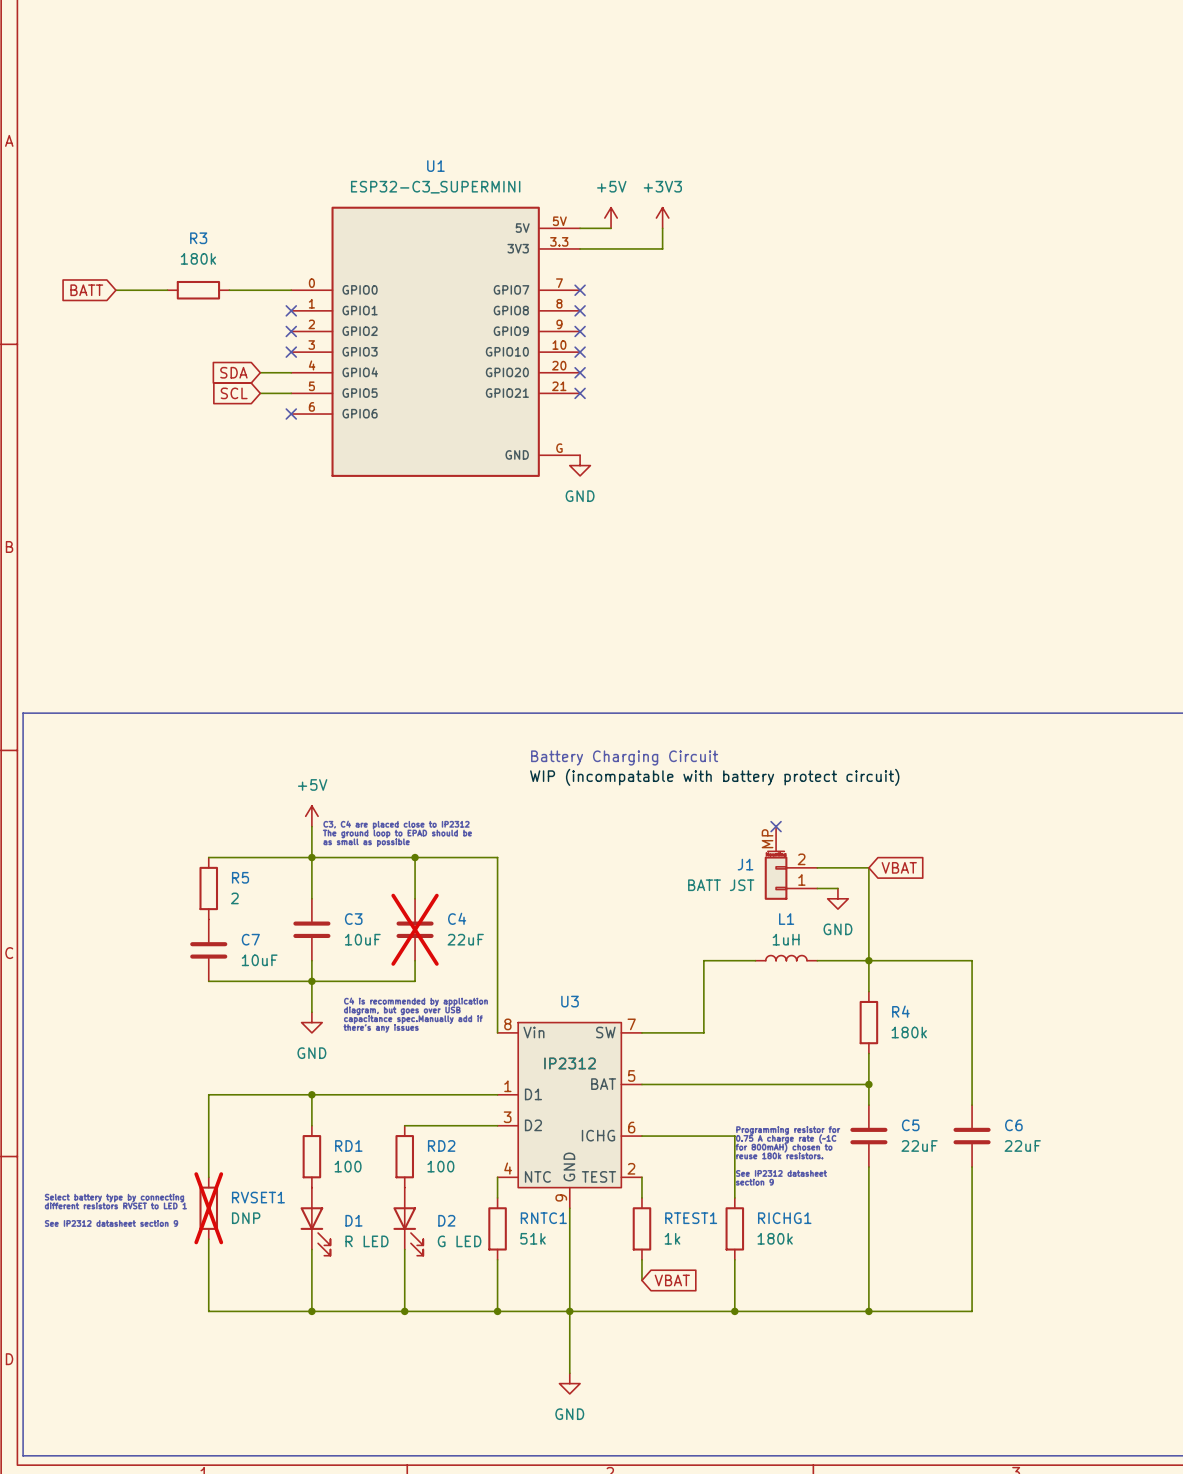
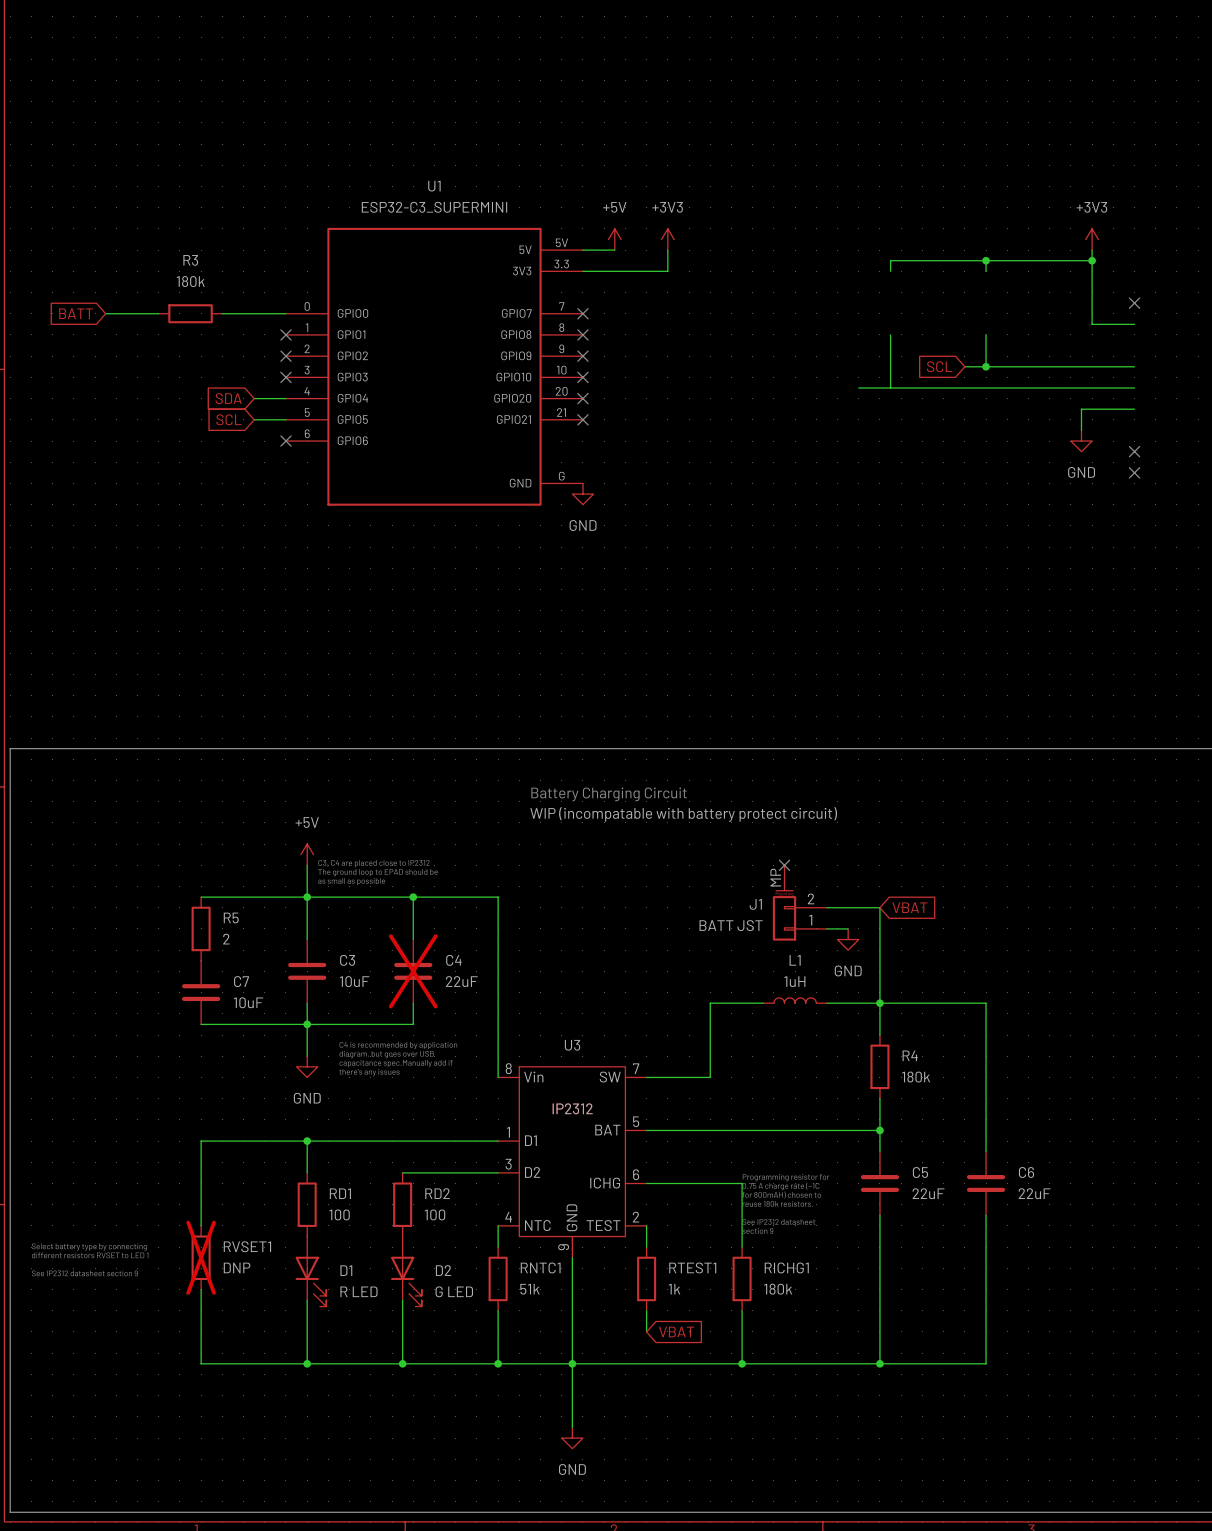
power symbol: none -> +3V3 (1092, 239)
wire: none -> (1092, 250) (1092, 324) (1134, 324)
wire: none -> (986, 260) (986, 271)
junction: none -> (986, 260)
wire: none -> (1092, 260) (890, 260) (890, 271)
junction: none -> (1092, 260)
no-connect mark: none -> (1134, 303)
wire: none -> (890, 334) (890, 387)
wire: none -> (986, 334) (986, 366)
global label: none -> SCL (939, 366)
wire: none -> (964, 366) (1134, 366)
junction: none -> (986, 366)
wire: none -> (858, 387) (1134, 387)
wire: none -> (1134, 409) (1081, 409) (1081, 430)
power symbol: none -> GND (1081, 441)
no-connect mark: none -> (1134, 451)
no-connect mark: none -> (1134, 472)

